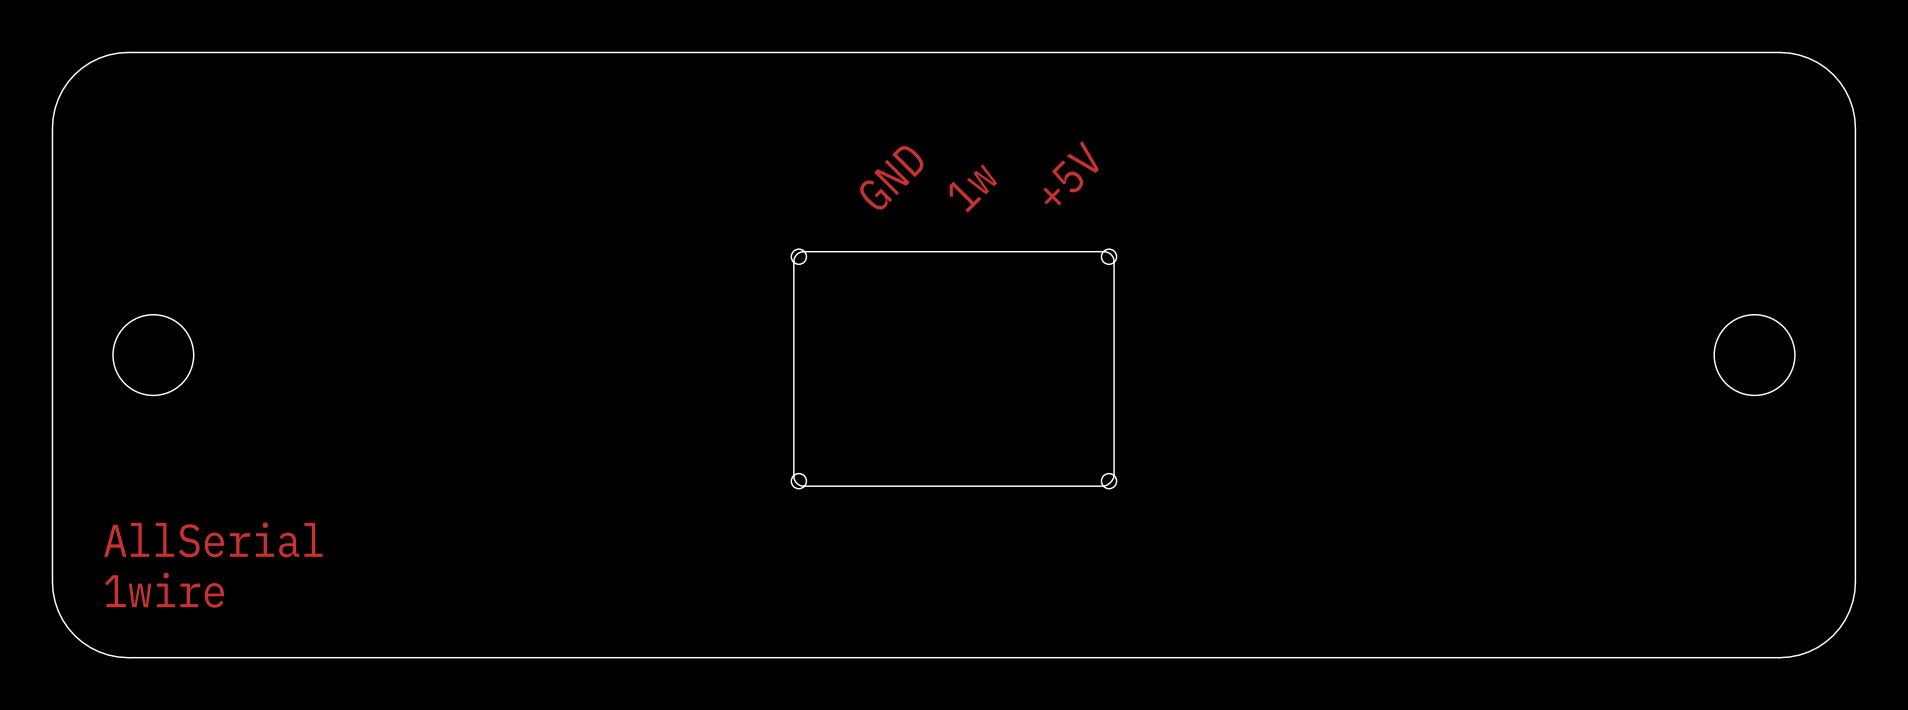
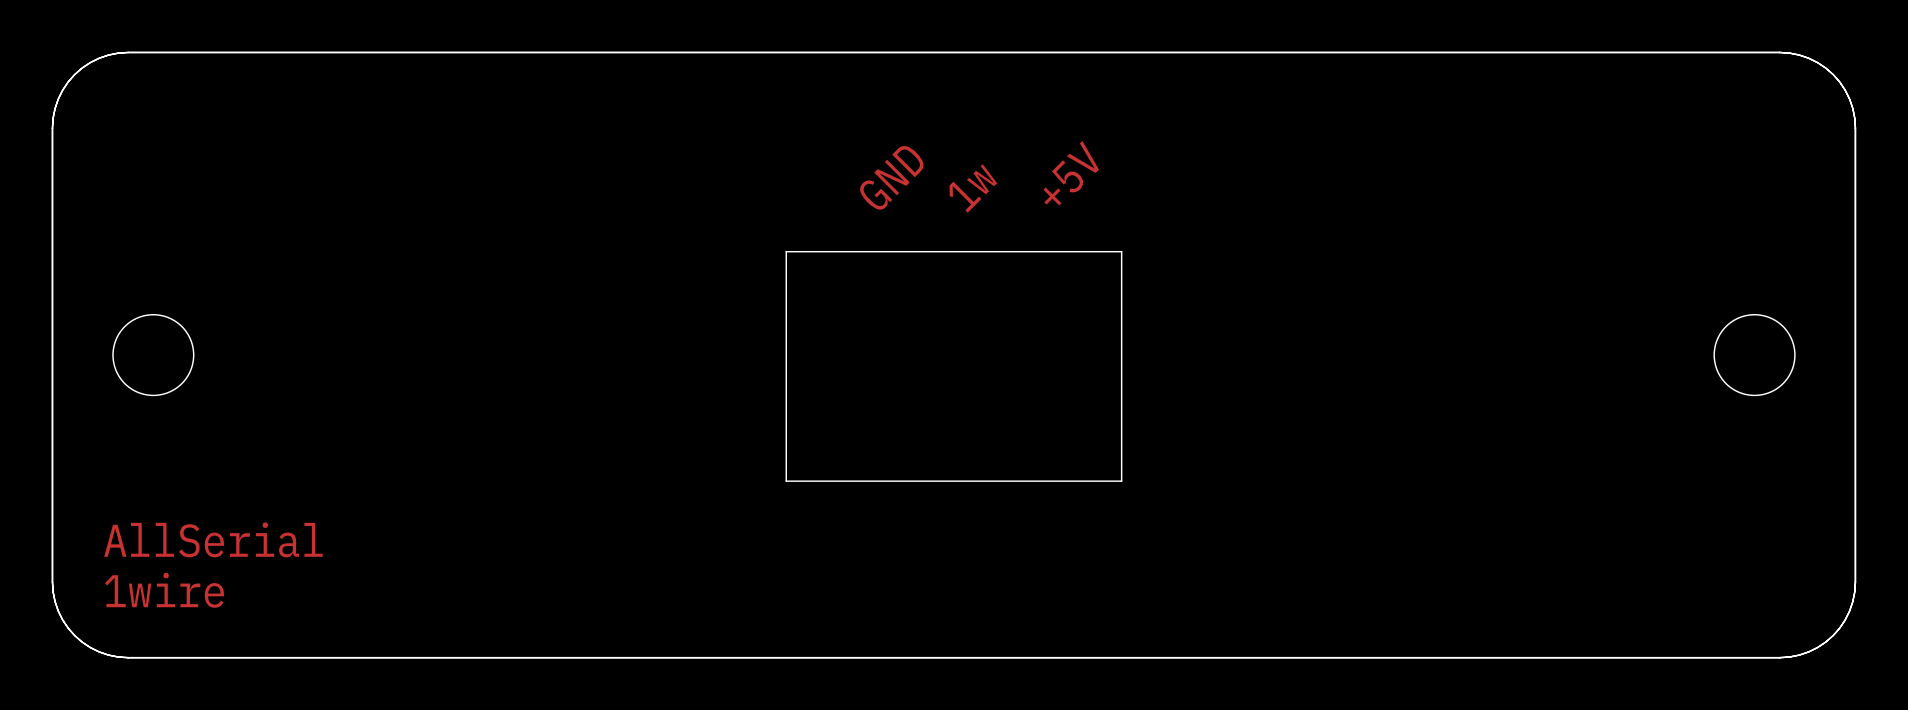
board edge: none -> (128, 52) (1779, 52) (1799, 55) (1825, 68) (1839, 82) (1849, 99) (1854, 118) (1855, 582) (1852, 601) (1839, 628) (1825, 642) (1799, 655) (1779, 657) (128, 657) (108, 655) (82, 642) (68, 628) (58, 610) (53, 591) (52, 128) (58, 99) (74, 74) (99, 58) (128, 52)
board edge: none -> (786, 251) (786, 481) (1121, 481) (1121, 251) (786, 251)
part: (953, 368) -> none

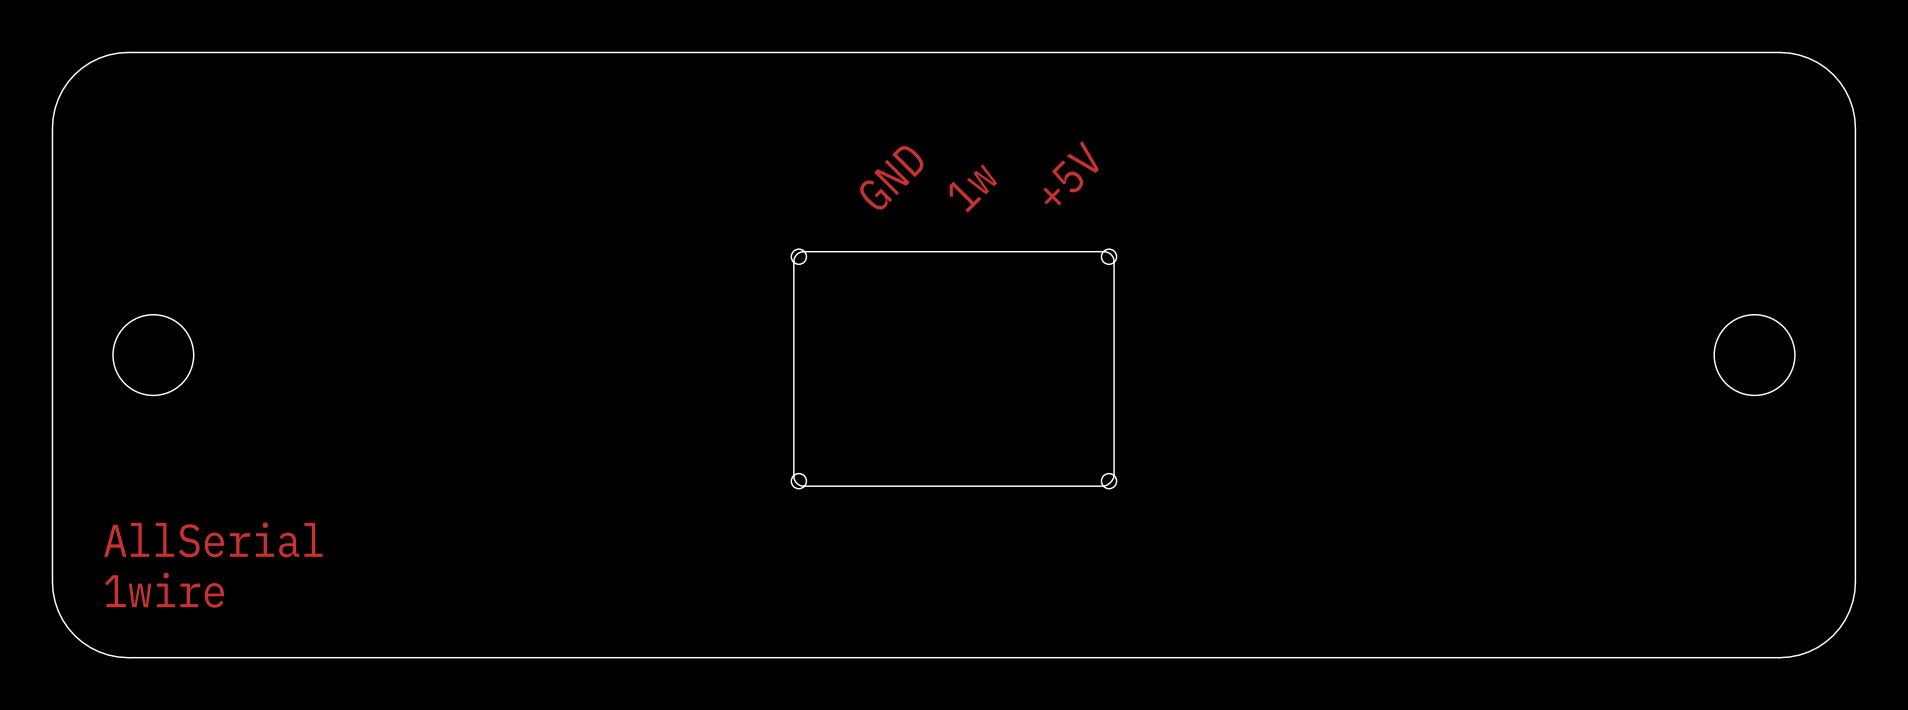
board edge: (128, 52) (1779, 52) (1799, 55) (1825, 68) (1839, 82) (1849, 99) (1854, 118) (1855, 582) (1852, 601) (1839, 628) (1825, 642) (1799, 655) (1779, 657) (128, 657) (108, 655) (82, 642) (68, 628) (58, 610) (53, 591) (52, 128) (58, 99) (74, 74) (99, 58) (128, 52) -> none
board edge: (786, 251) (786, 481) (1121, 481) (1121, 251) (786, 251) -> none
part: none -> (953, 368)

